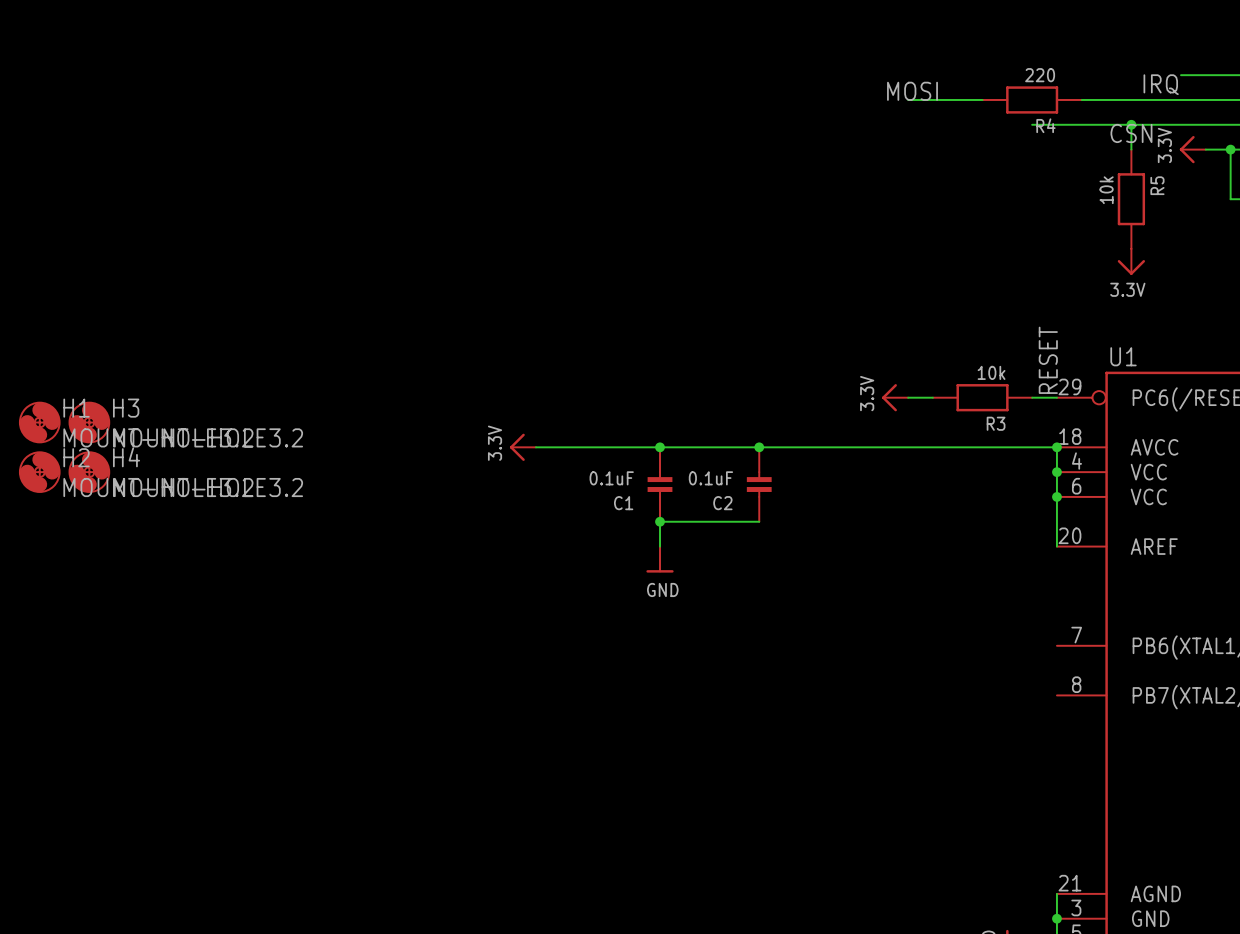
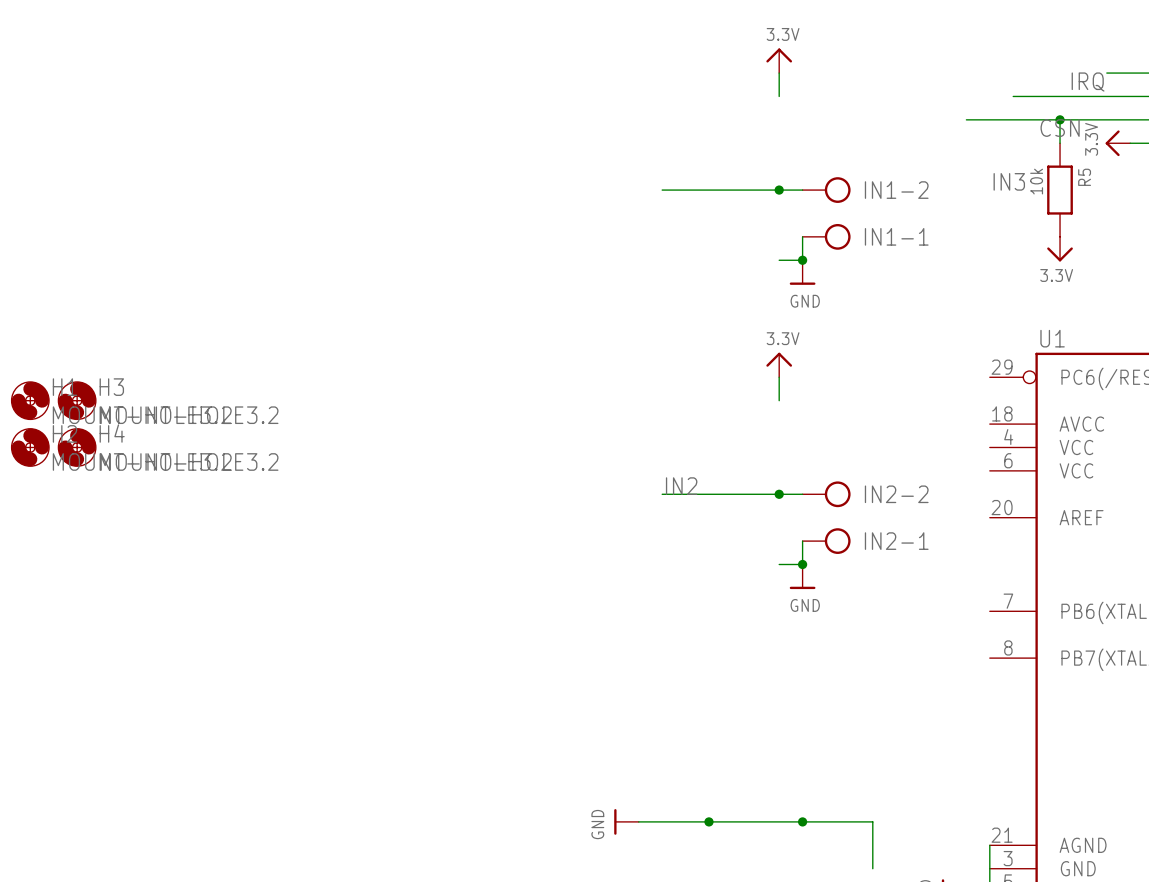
power symbol: none -> 3.3V (779, 60)
wire: none -> (779, 73) (779, 96)
label: MOSI (912, 91) -> none
wire: (908, 99) (982, 99) -> none
R4: 220 (1032, 99) -> none
label: none -> IN3 (1009, 181)
wire: none -> (662, 190) (802, 190)
junction: none -> (779, 190)
IN1-2: none -> (826, 190)
wire: none -> (802, 236) (802, 260) (779, 260)
IN1-1: none -> (826, 236)
junction: none -> (802, 260)
power symbol: none -> GND (802, 272)
label: RESET (1048, 360) -> none
wire: none -> (779, 377) (779, 400)
power symbol rotation: 0° (889, 397) -> 90° clockwise (779, 359)
power symbol position: 3.3V (895, 397) -> 3.3V (779, 364)
wire: (908, 397) (932, 397) -> none
R3: 10k (982, 397) -> none
wire: (1032, 397) (1056, 397) -> none
power symbol: 3.3V (522, 447) -> none
wire: (535, 447) (1056, 447) (1056, 546) -> none
junction: (660, 447) -> none
junction: (759, 447) -> none
junction: (1056, 447) -> none
junction: (1056, 472) -> none
C1: 0.1uF (660, 484) -> none
C2: 0.1uF (759, 484) -> none
junction: (1056, 496) -> none
label: none -> IN2 (681, 486)
junction: (660, 521) -> none
wire: (709, 521) (660, 521) (660, 546) -> none
wire: none -> (708, 494) (802, 494)
junction: none -> (779, 494)
IN2-2: none -> (826, 494)
power symbol: GND (660, 559) -> none
wire: none -> (802, 541) (802, 564) (779, 564)
IN2-1: none -> (826, 541)
junction: none -> (802, 564)
power symbol: none -> GND (802, 576)
power symbol: none -> GND (626, 821)
wire: none -> (638, 821) (872, 821) (872, 868)
junction: none -> (708, 821)
junction: none -> (802, 821)
junction: (1056, 918) -> none

